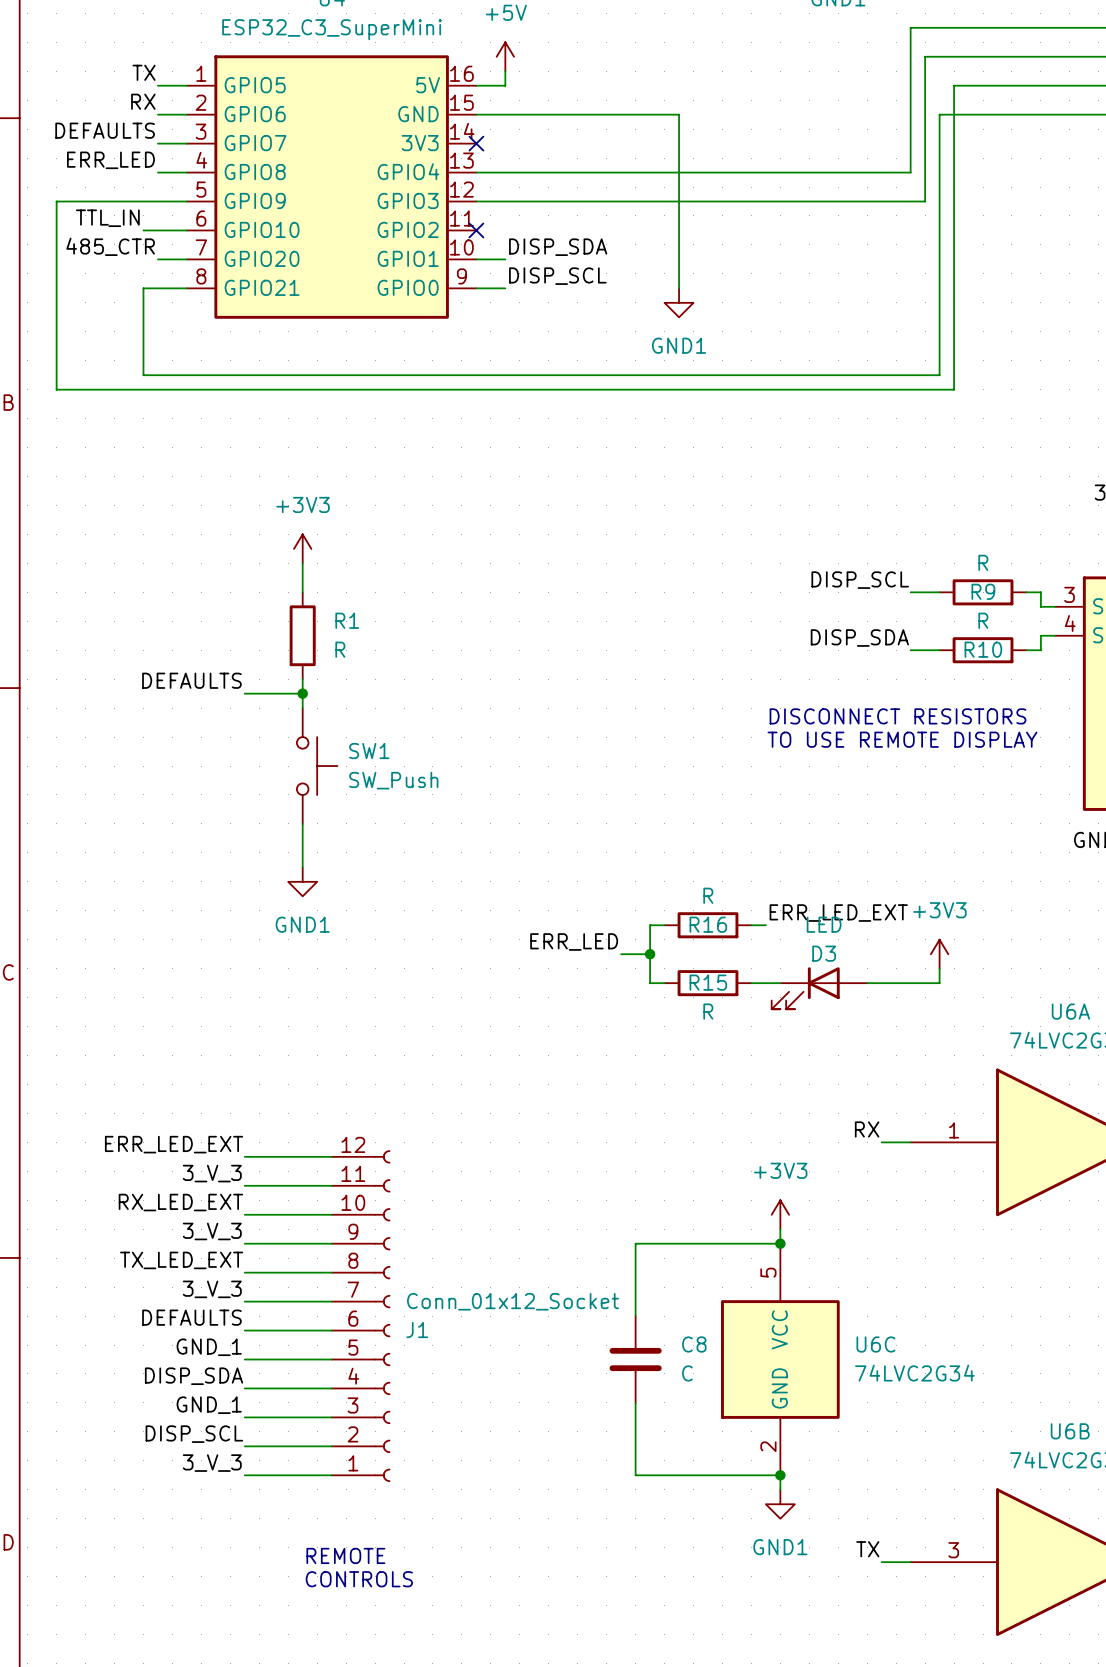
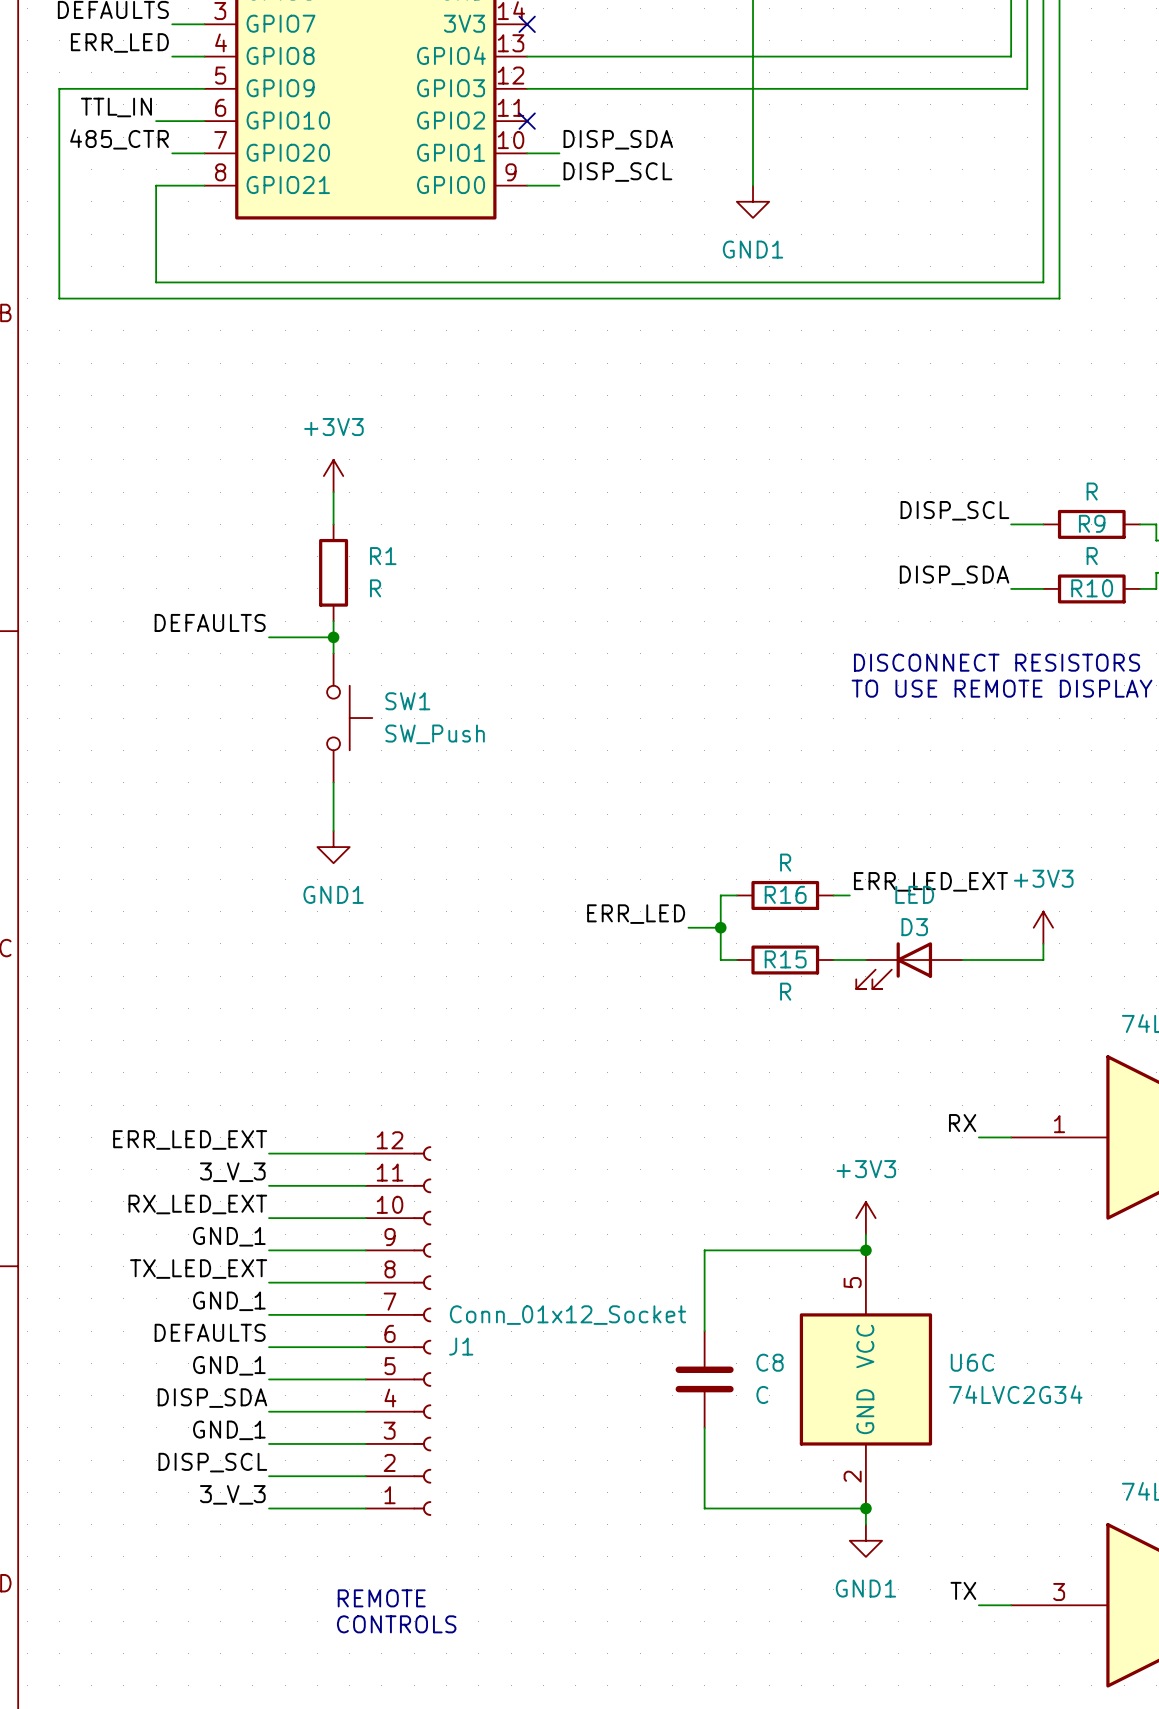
label: 3_V_3 (212, 1231) -> GND_1 (229, 1236)
label: 3_V_3 (212, 1289) -> GND_1 (229, 1301)

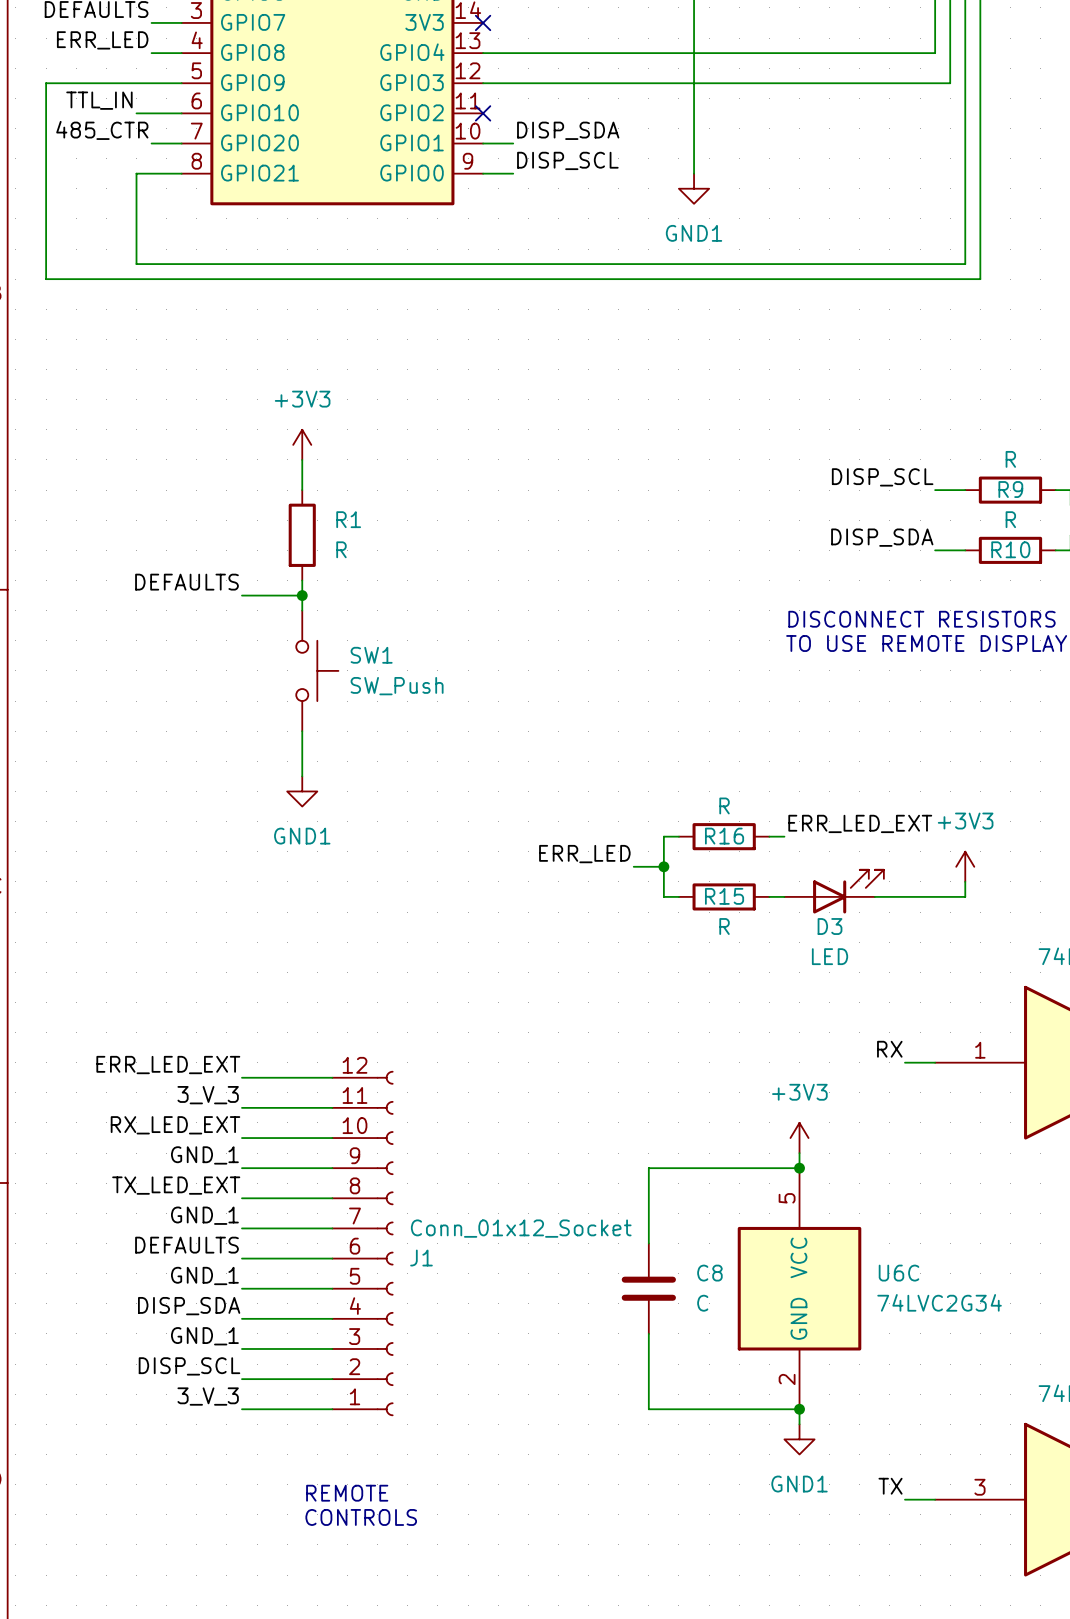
D3 rotation: 0° (894, 965) -> 180° (848, 891)

